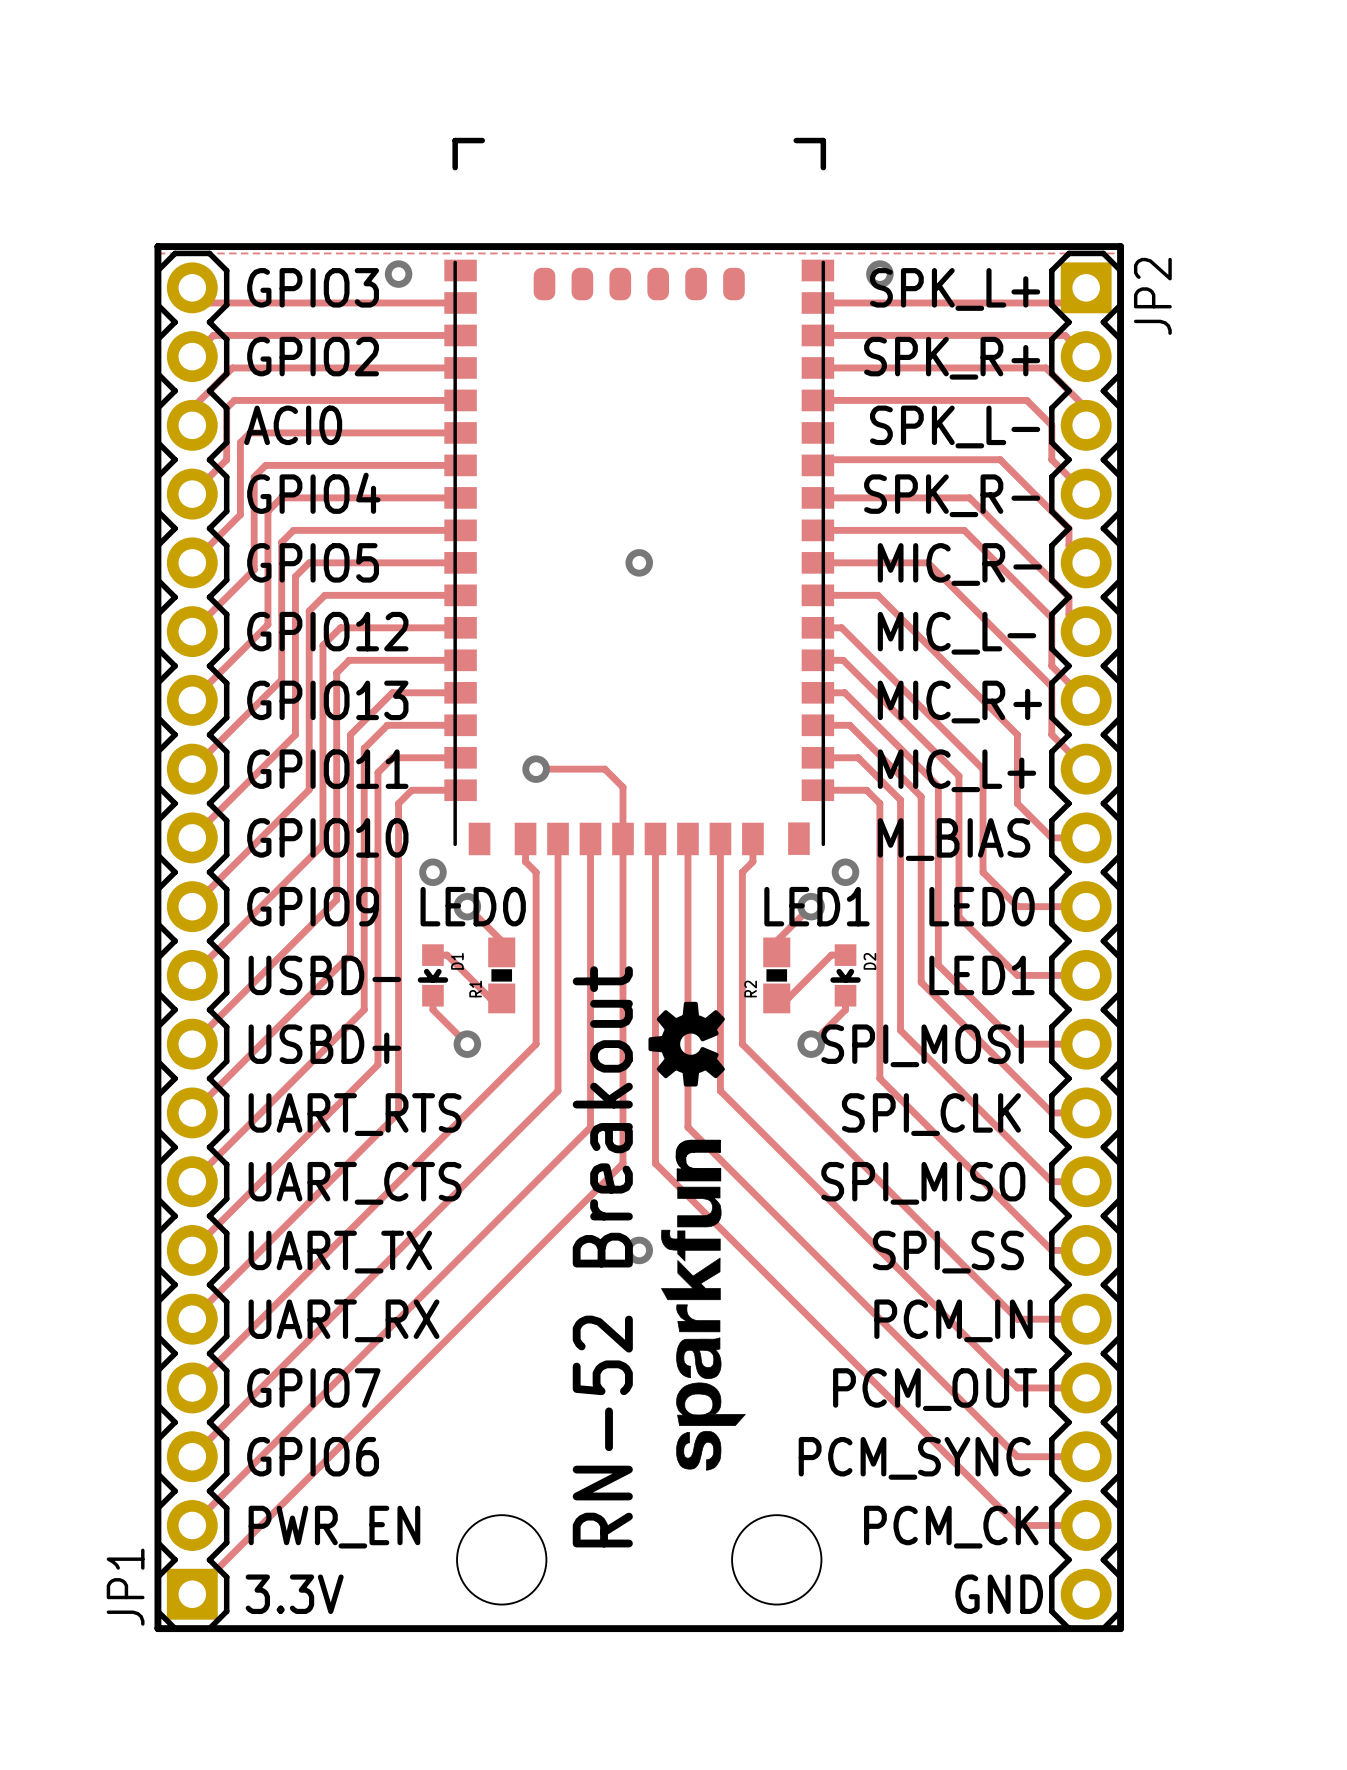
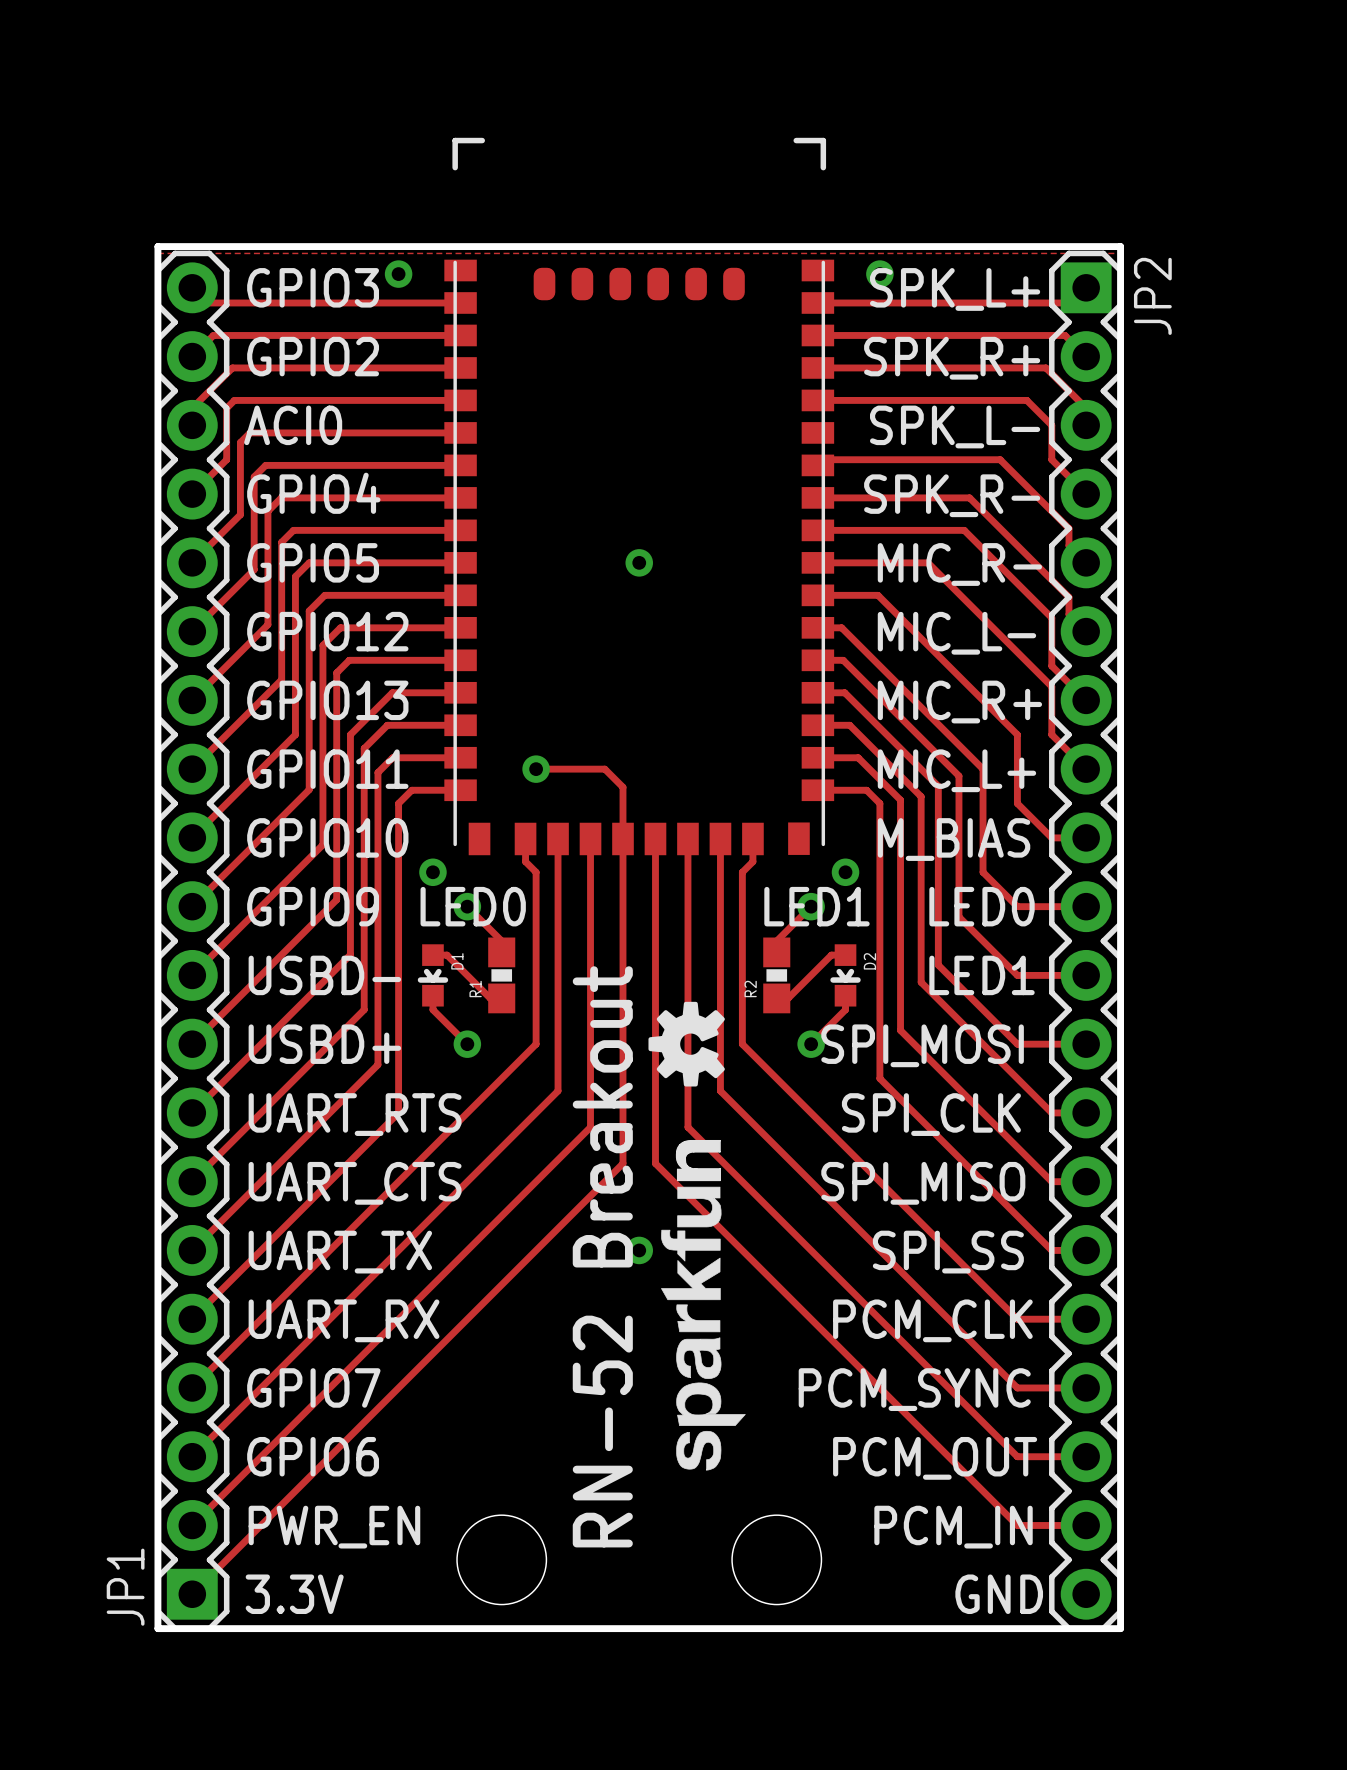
text: none -> PCM_CLK (932, 1320)
text position: PCM_IN (953, 1320) -> PCM_IN (953, 1527)
text position: PCM_OUT (935, 1389) -> PCM_OUT (935, 1458)
text position: PCM_SYNC (914, 1458) -> PCM_SYNC (914, 1389)
text: PCM_CK (951, 1527) -> none

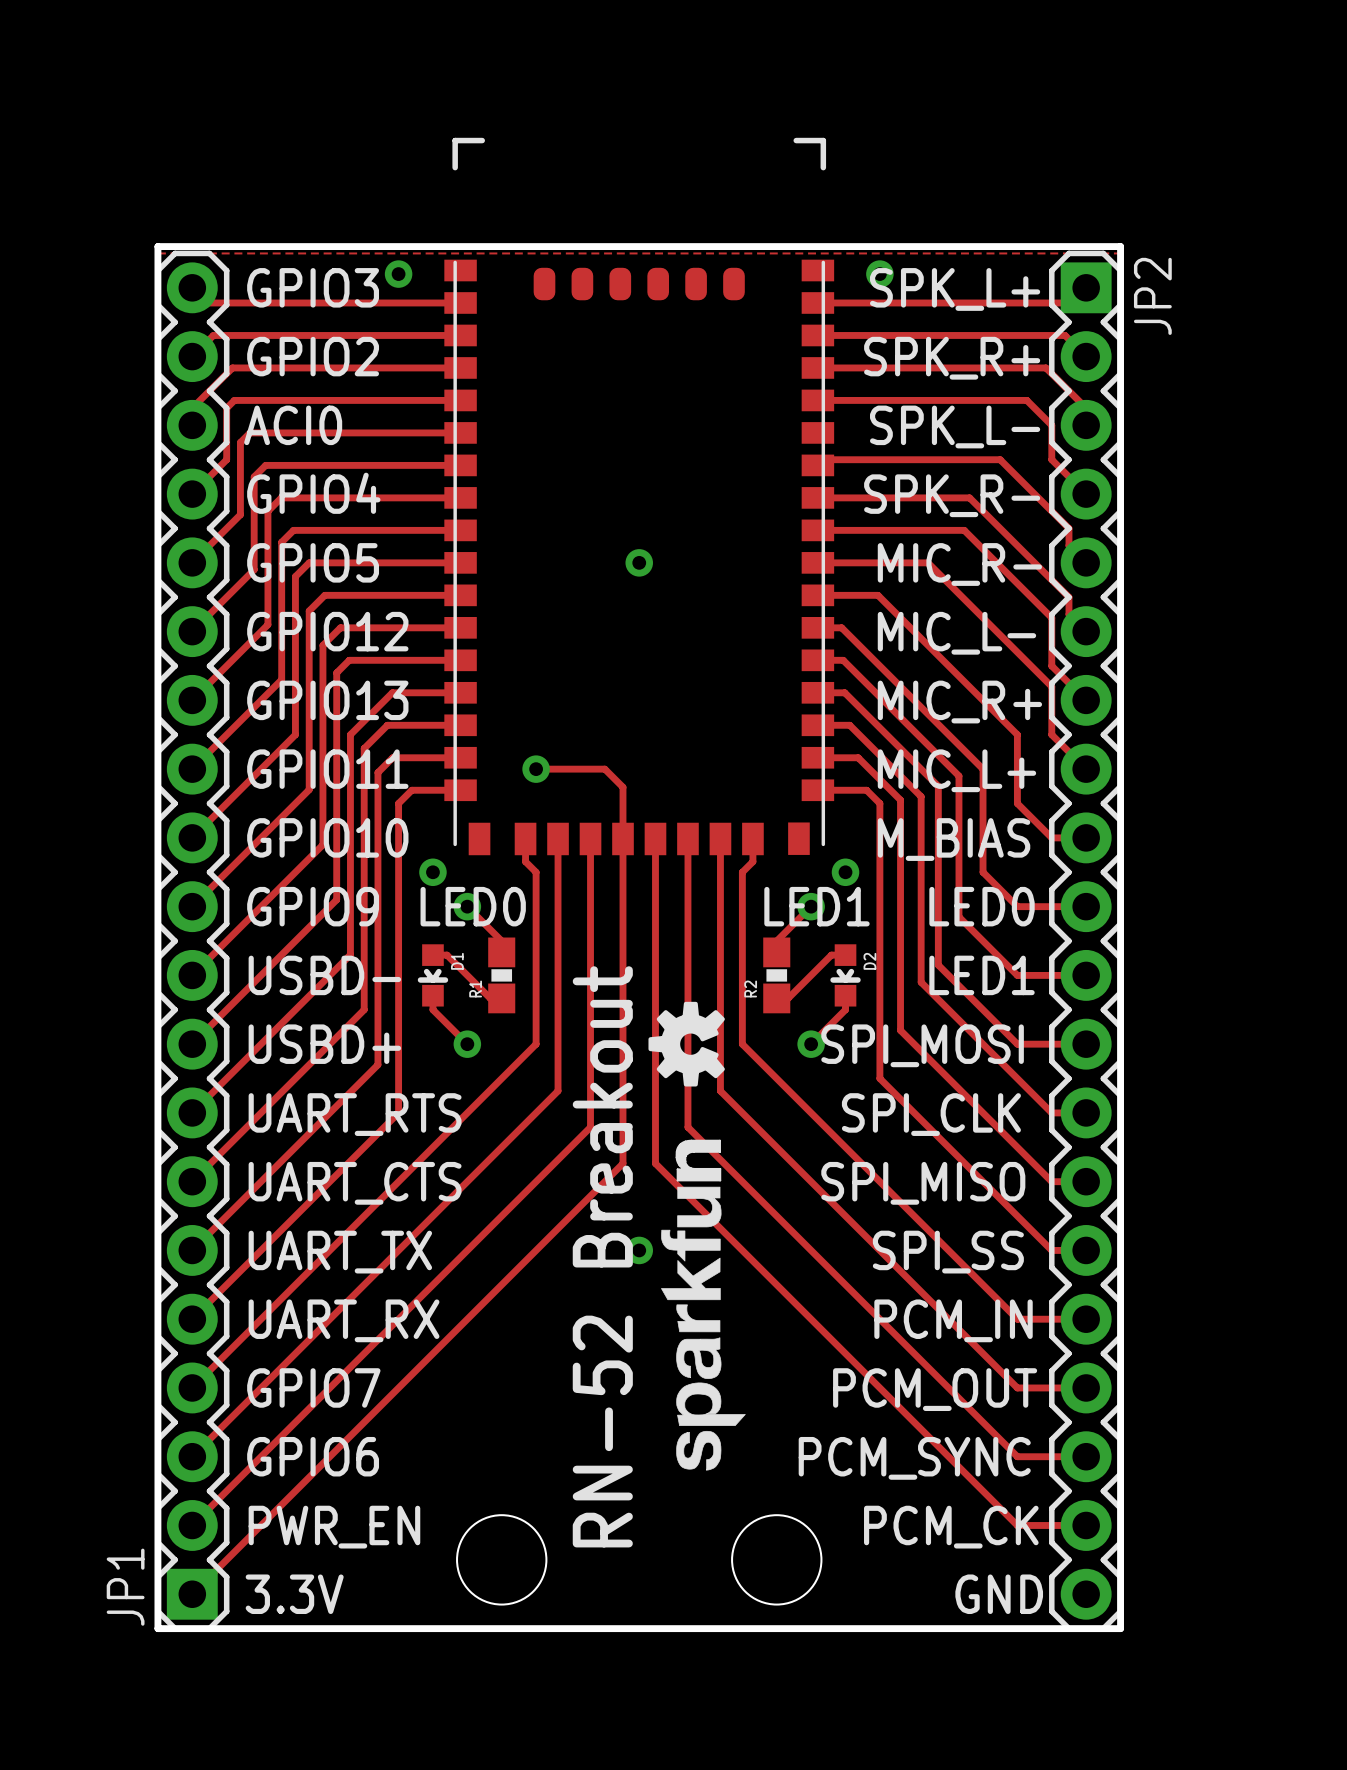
text: PCM_CLK (932, 1320) -> none
text position: PCM_SYNC (914, 1389) -> PCM_SYNC (914, 1458)
text position: PCM_OUT (935, 1458) -> PCM_OUT (935, 1389)
text: none -> PCM_CK (951, 1527)
text position: PCM_IN (953, 1527) -> PCM_IN (953, 1320)

